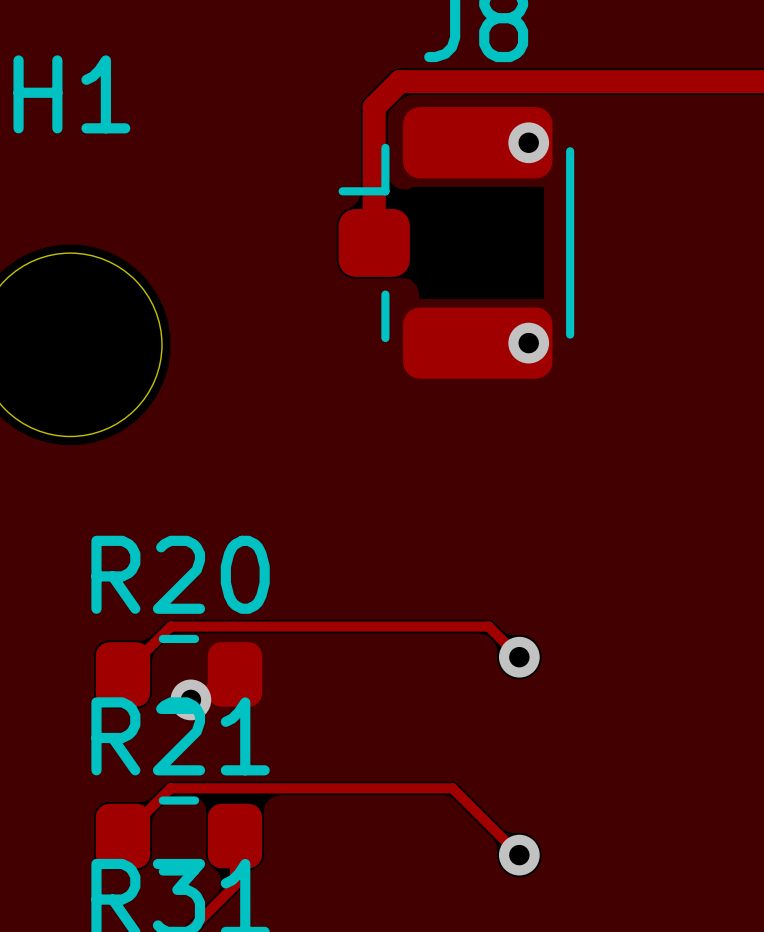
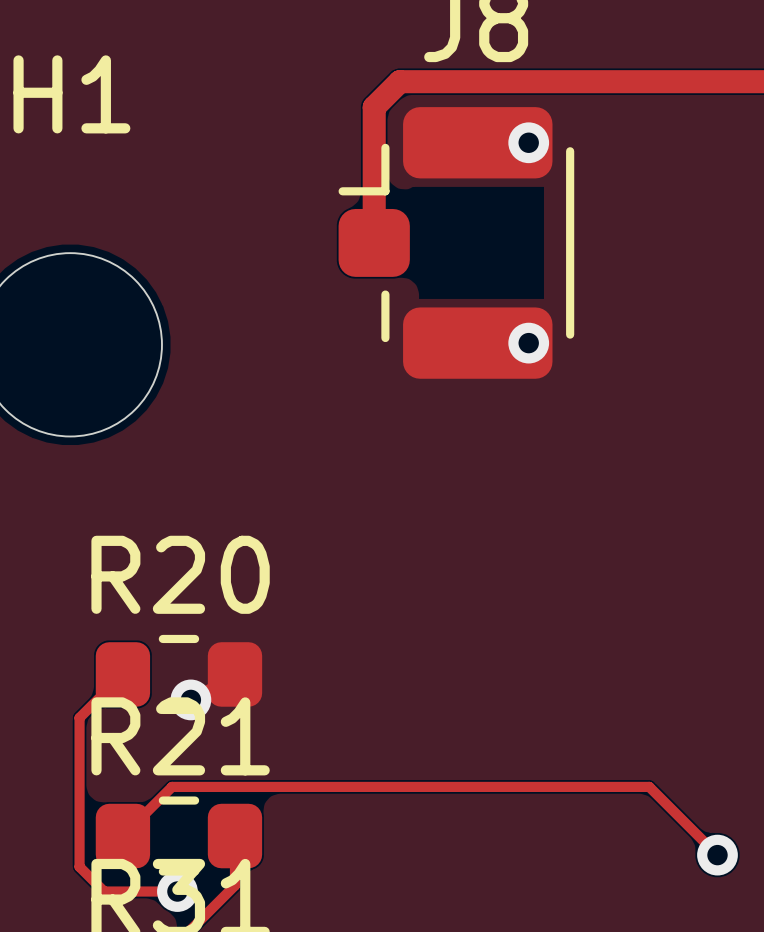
track: (519, 657) (488, 626) (170, 626) (122, 674) -> (177, 891) (104, 891) (79, 866) (79, 717) (122, 674)
via: (519, 657) -> none
track: (170, 788) (452, 788) (519, 855) -> (170, 788) (649, 786) (717, 855)
via: (519, 855) -> none
via: none -> (717, 855)
via: none -> (177, 891)

